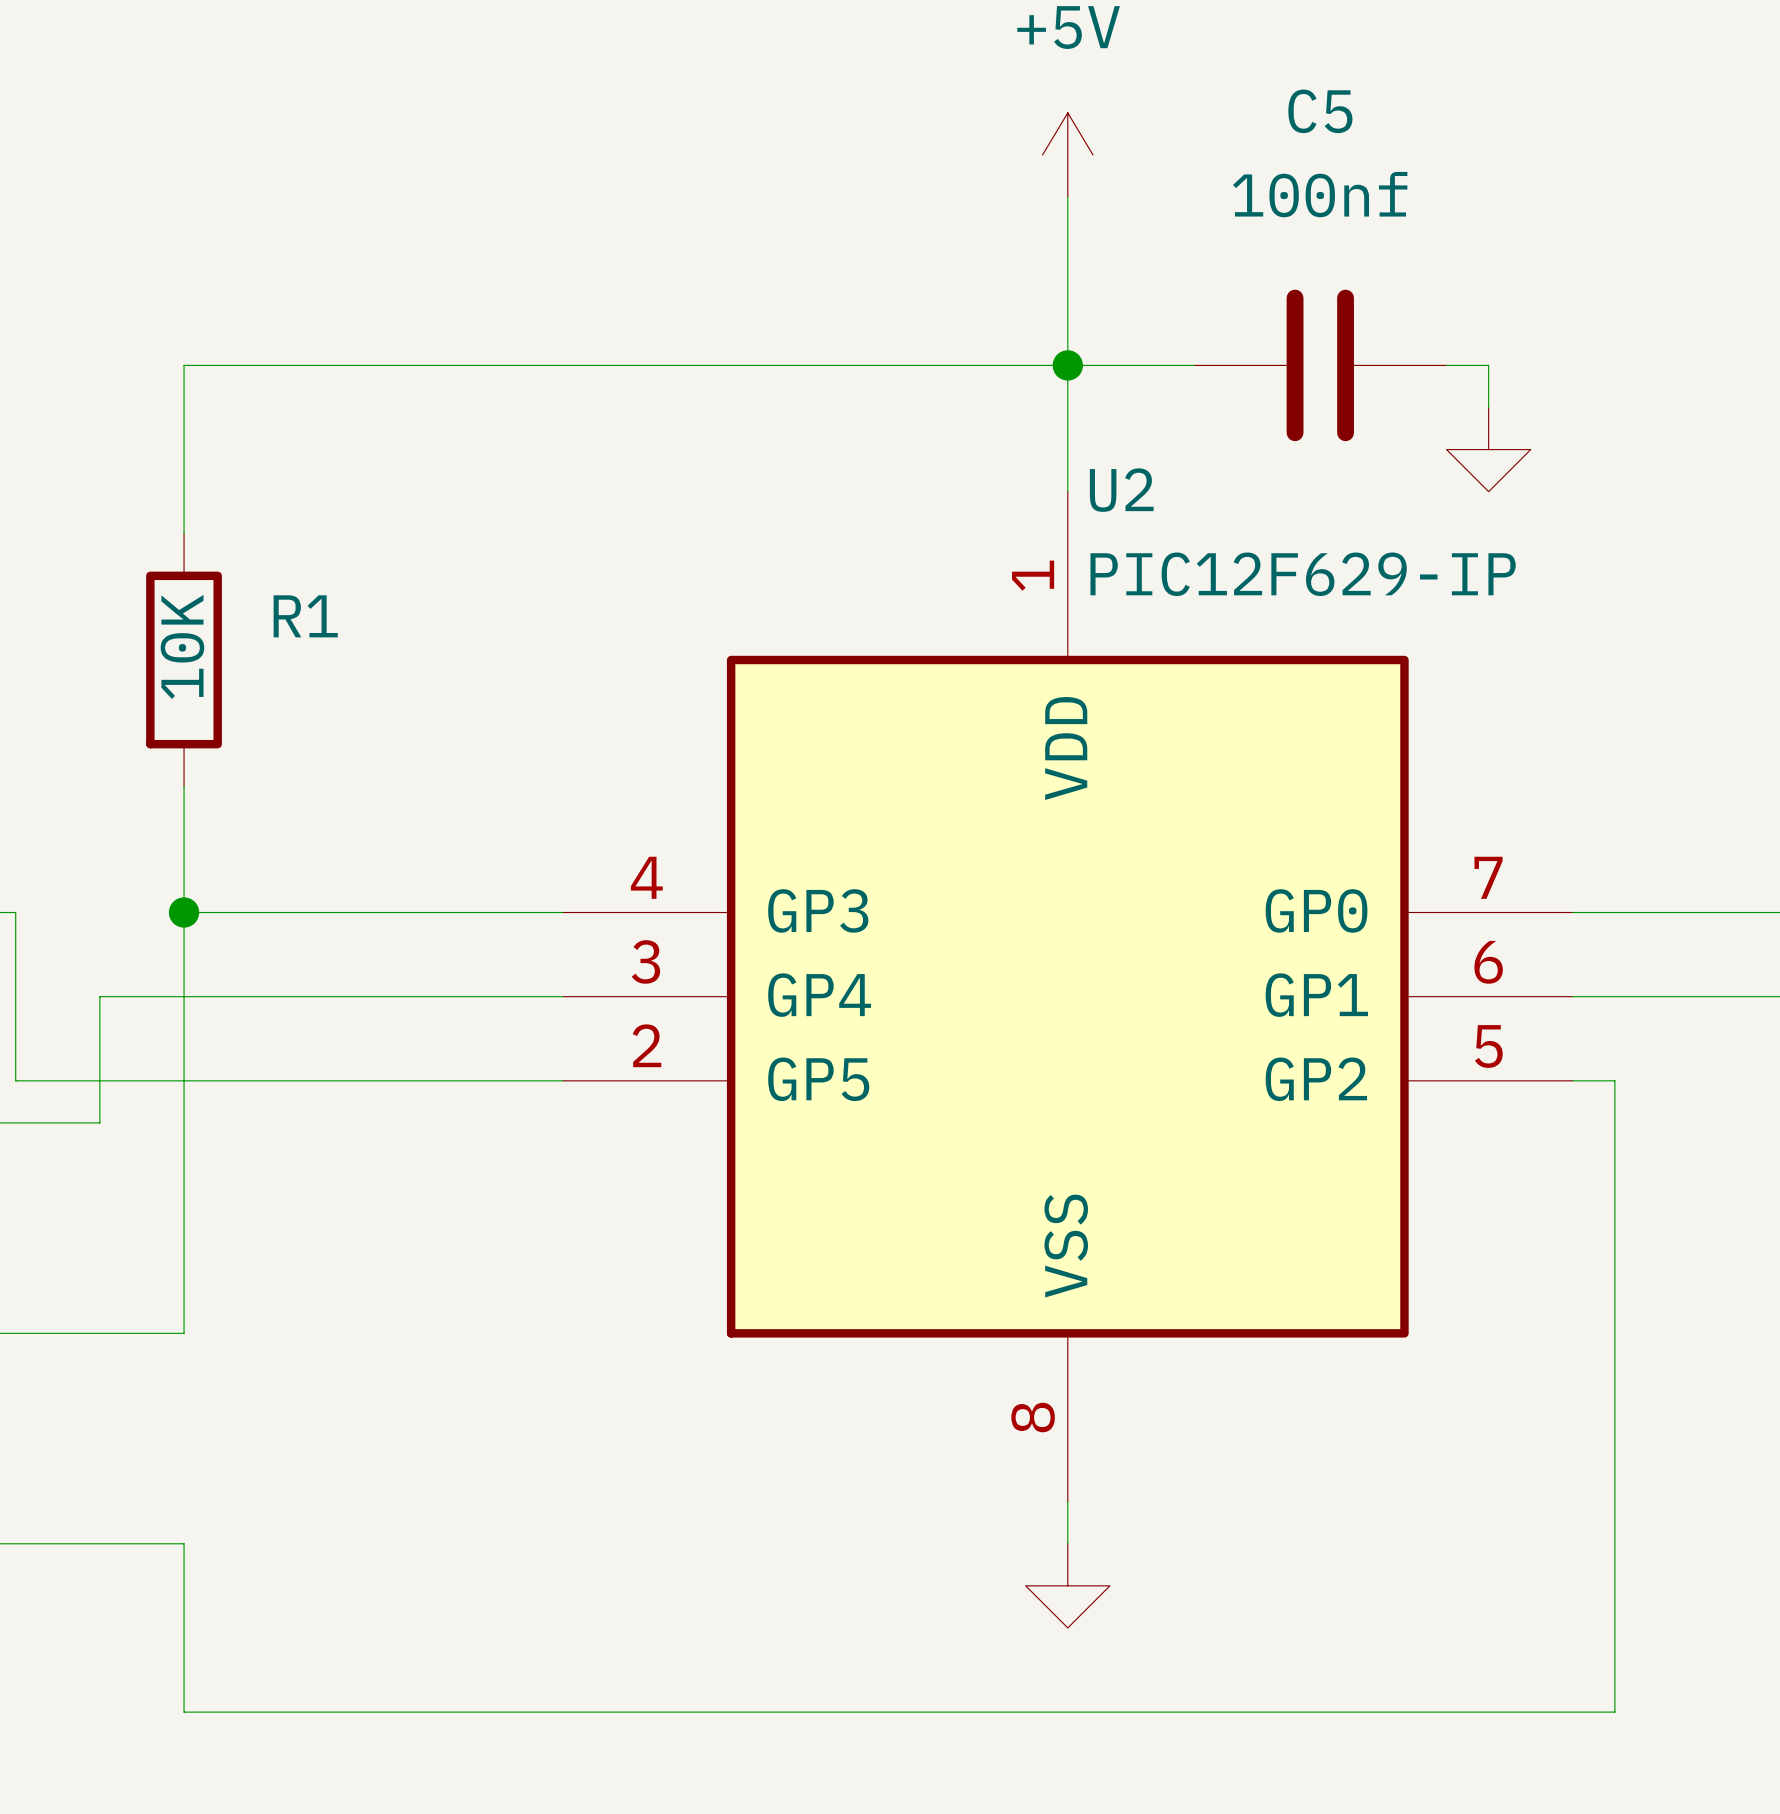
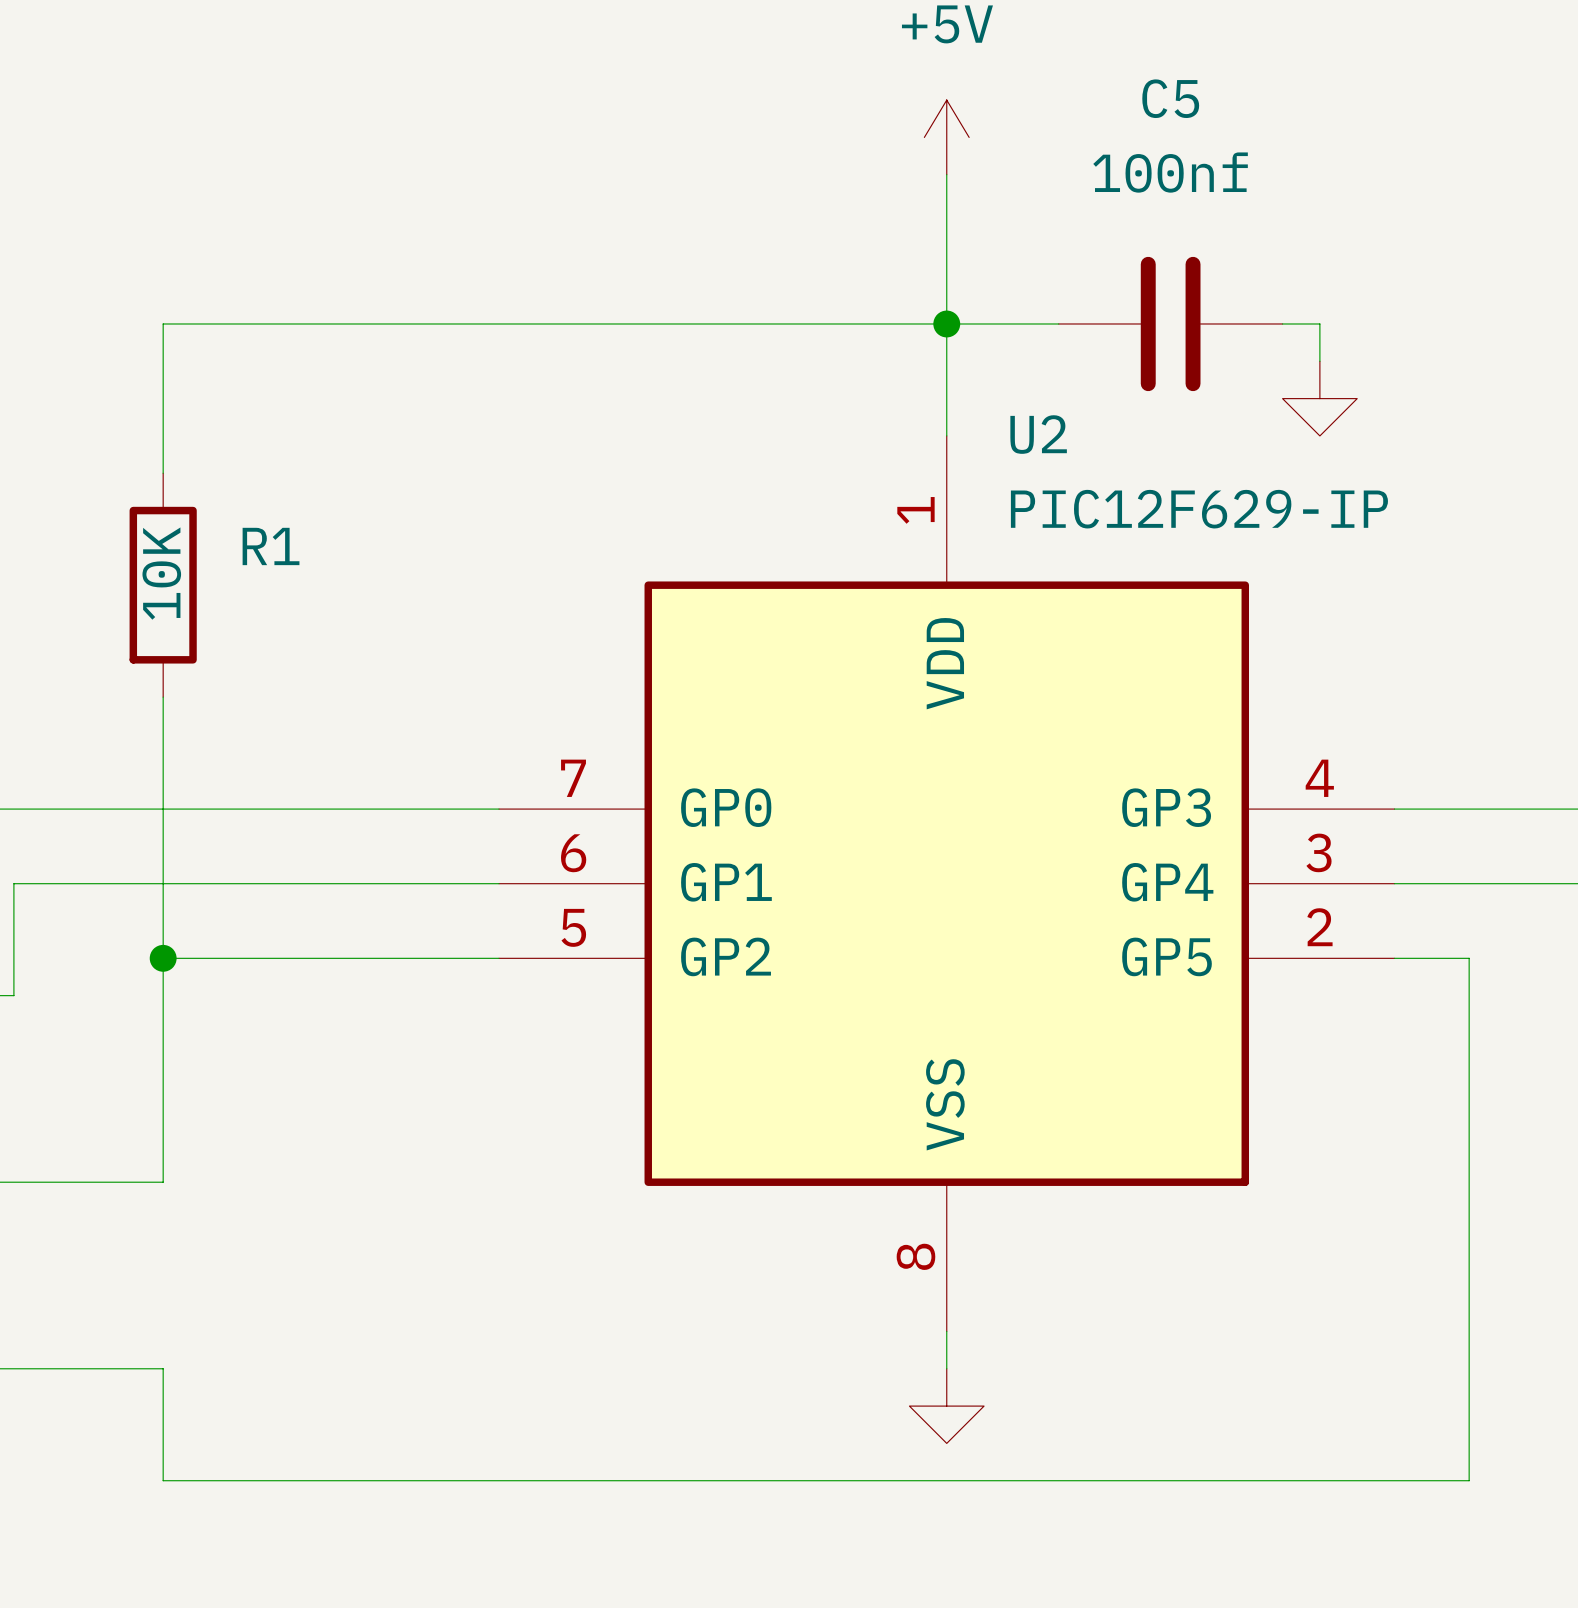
wire: (15, 912) (15, 996) -> (88, 883) (13, 883)
junction position: (184, 912) -> (163, 958)
wire: (99, 996) (99, 1122) (15, 1122) -> (13, 958) (13, 995)
U2 flip: as is (1067, 996) -> left-right (946, 883)
wire: (15, 1080) (184, 1080) -> (13, 809) (163, 809)
wire: (1614, 1080) (1614, 1712) (184, 1712) (184, 1670) -> (1431, 958) (1469, 958) (1469, 1480) (163, 1480)

